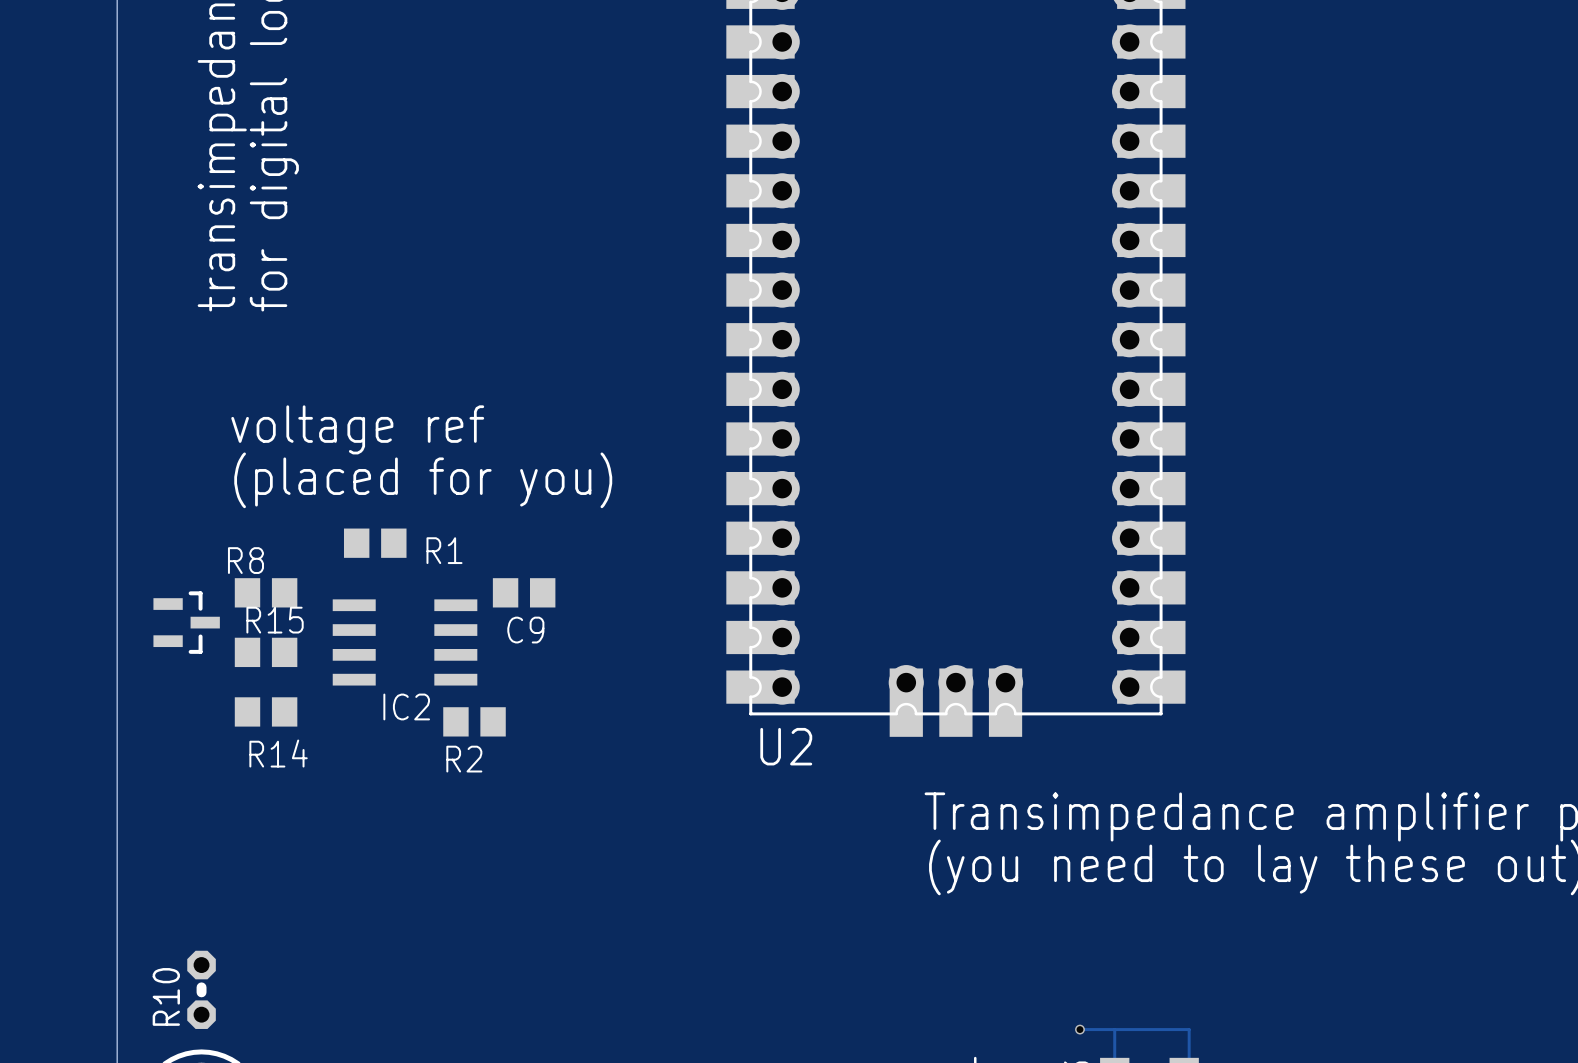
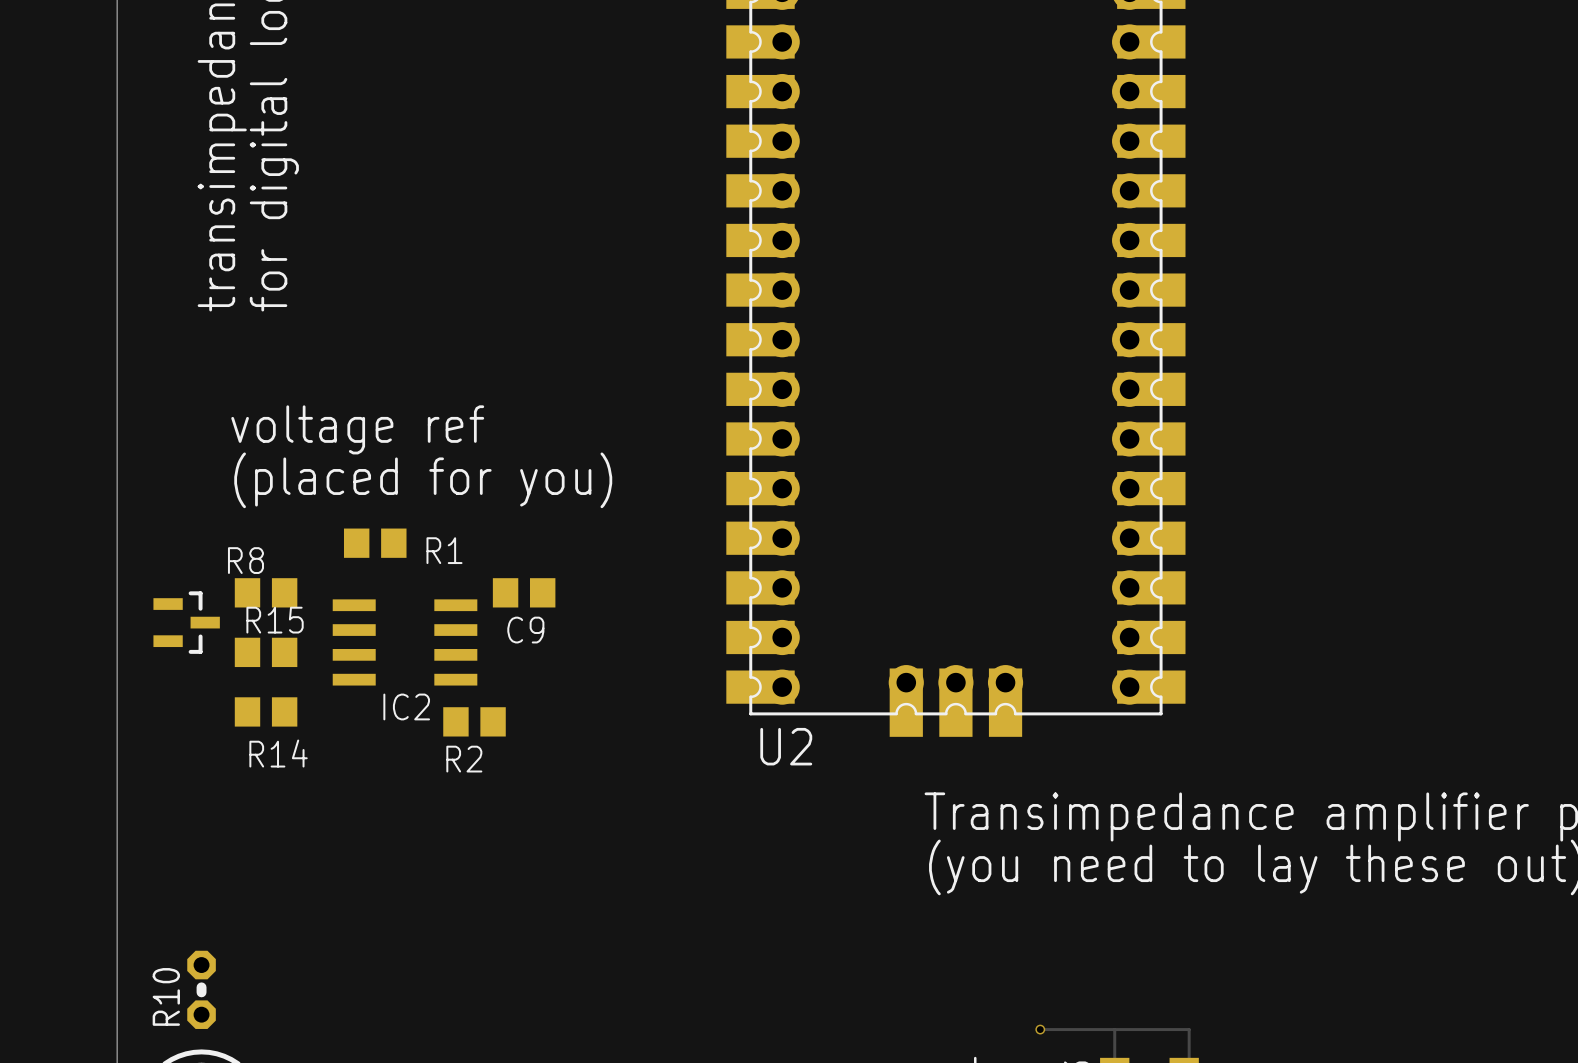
track: none -> (1040, 1029) (1079, 1029)
via position: (1079, 1029) -> (1040, 1029)

